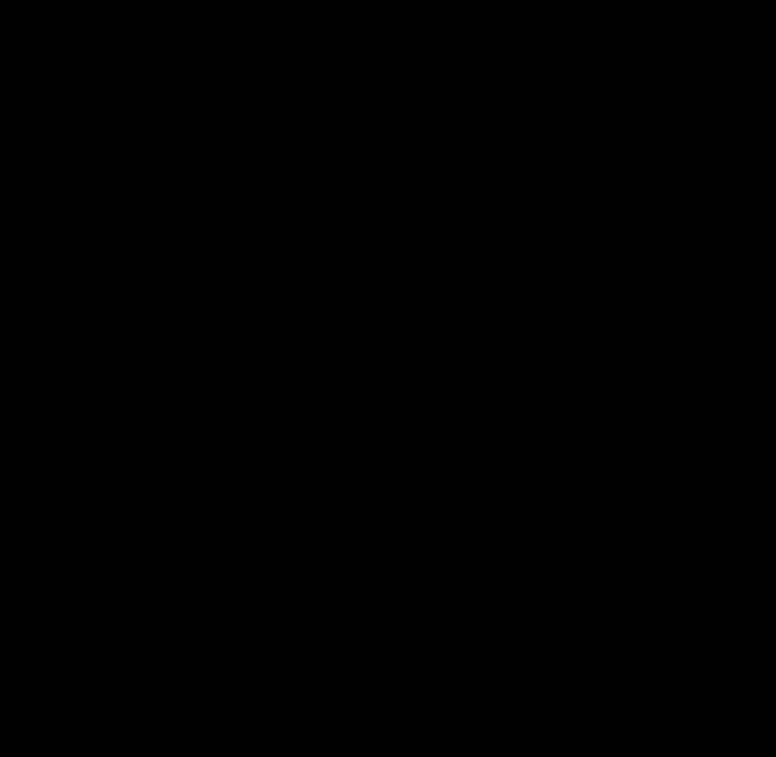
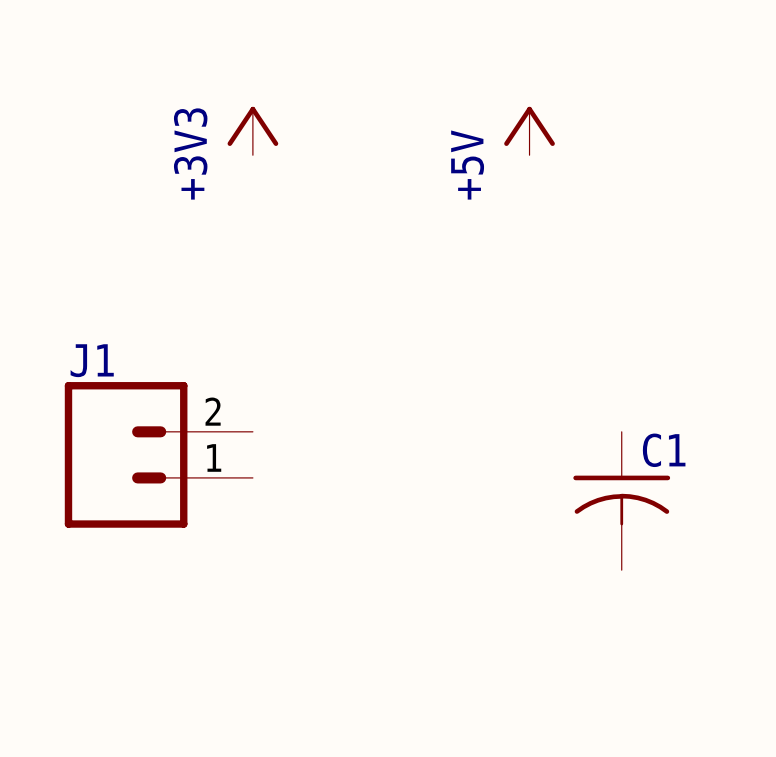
power symbol: none -> +3V3 (252, 131)
power symbol: none -> +5V (529, 131)
J1: none -> (158, 454)
C1: none -> (621, 500)

